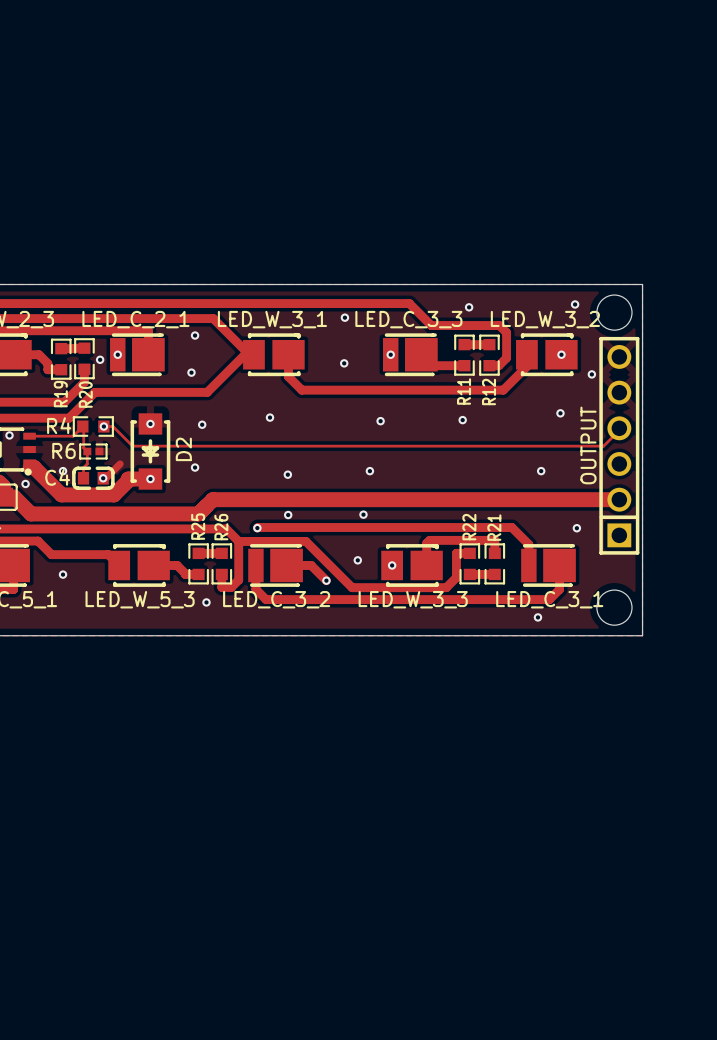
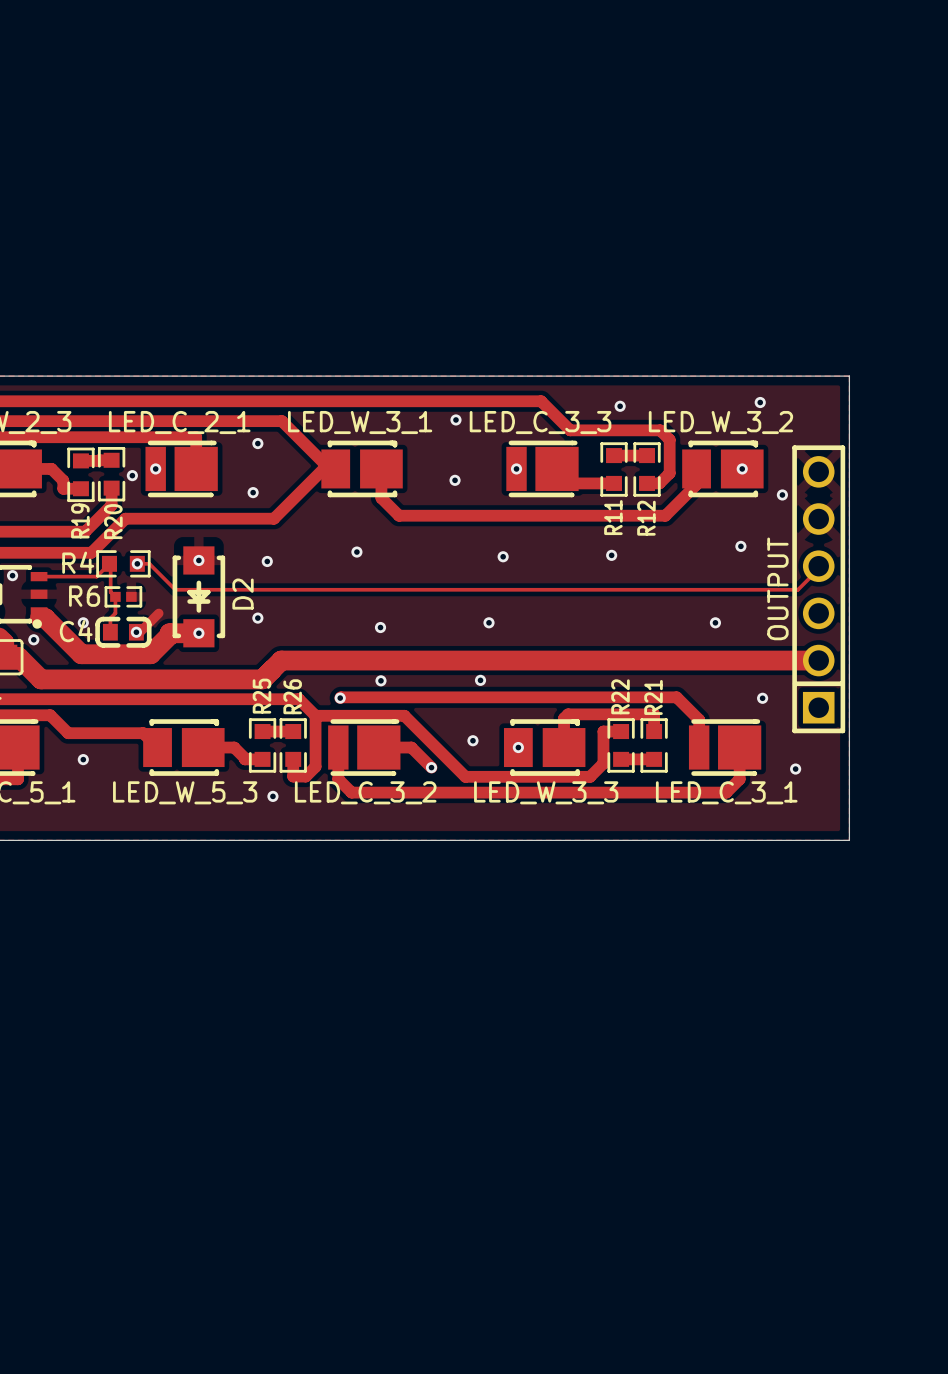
round board edge: [596, 294, 633, 331] -> none
round board edge: [596, 589, 633, 626] -> none
via position: (537, 617) -> (795, 769)

